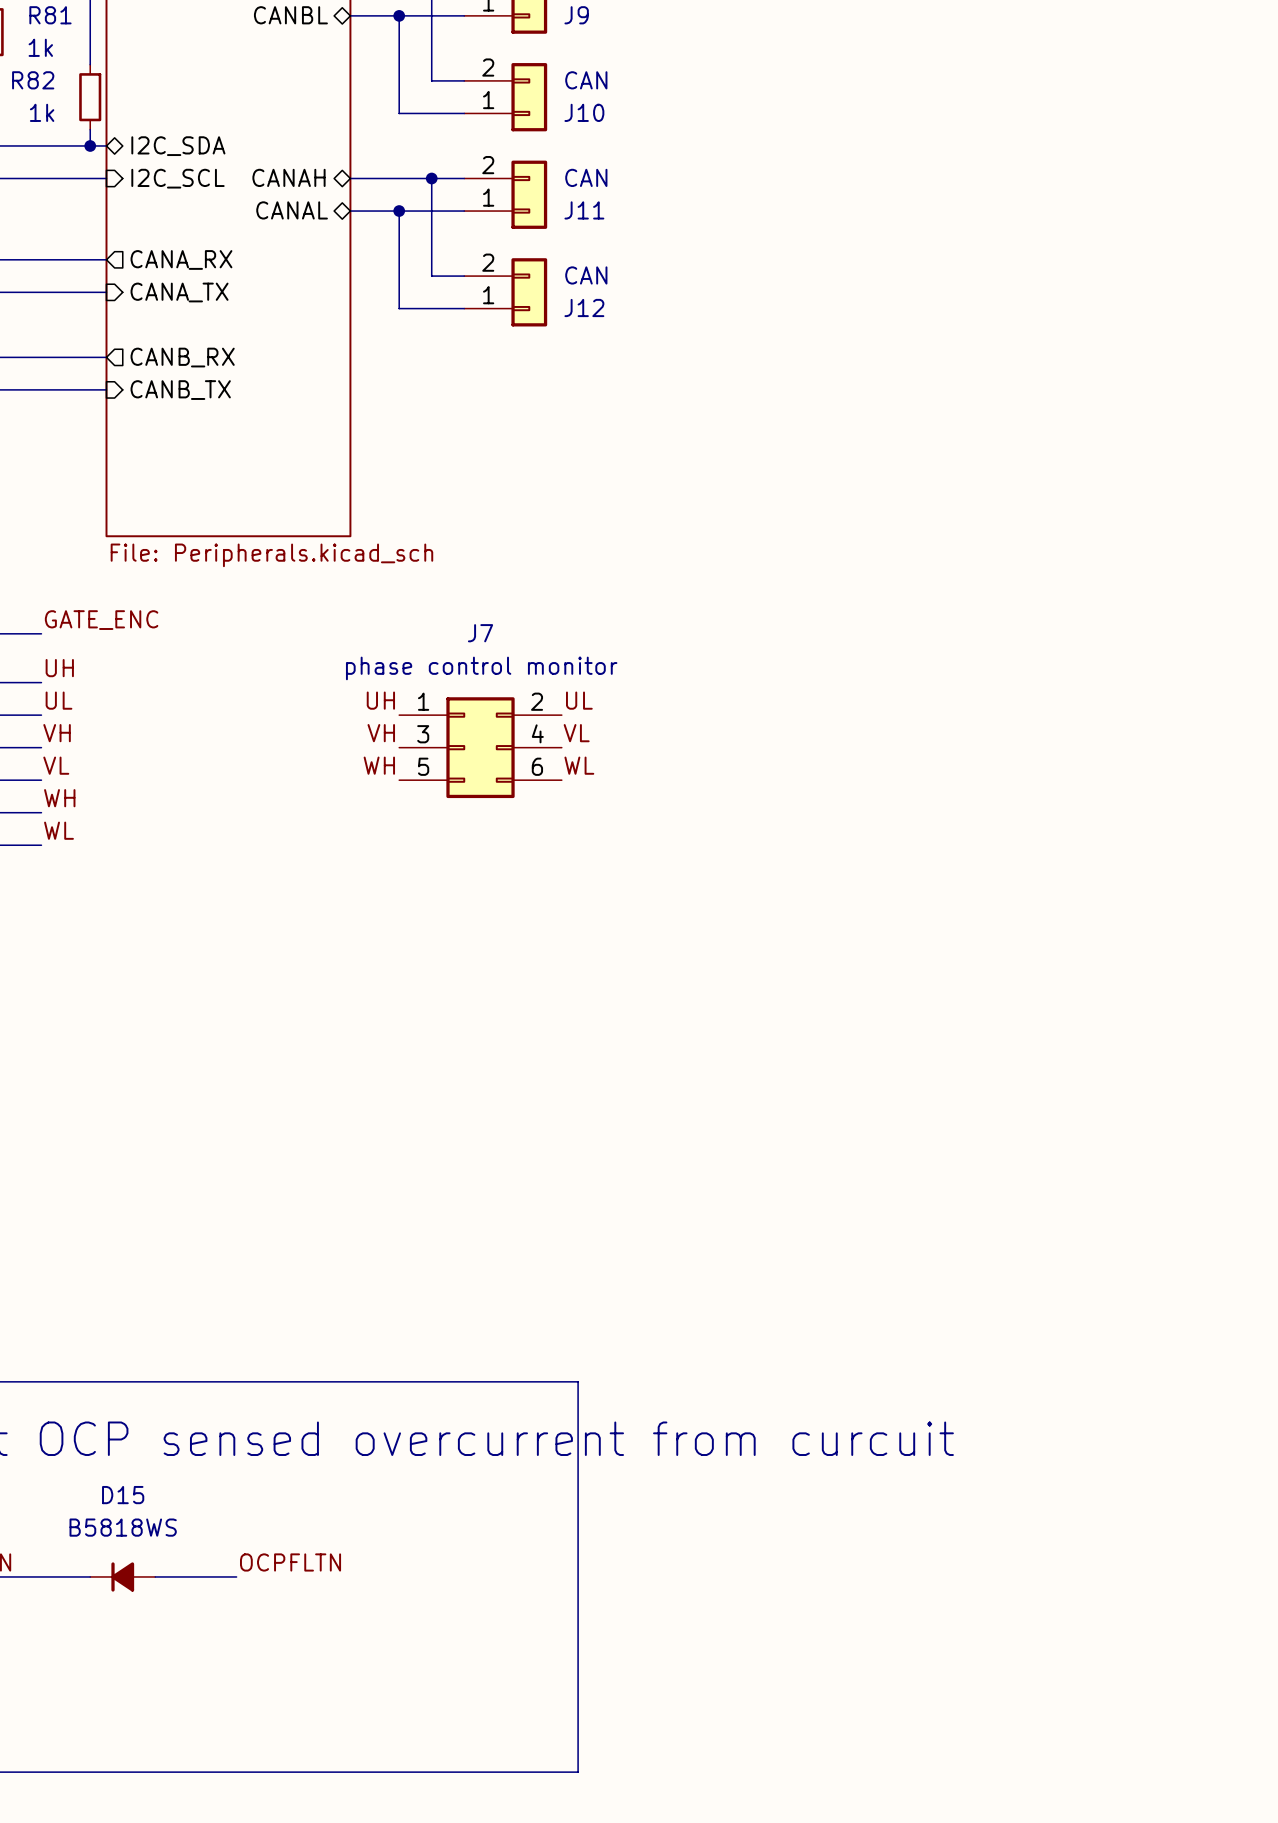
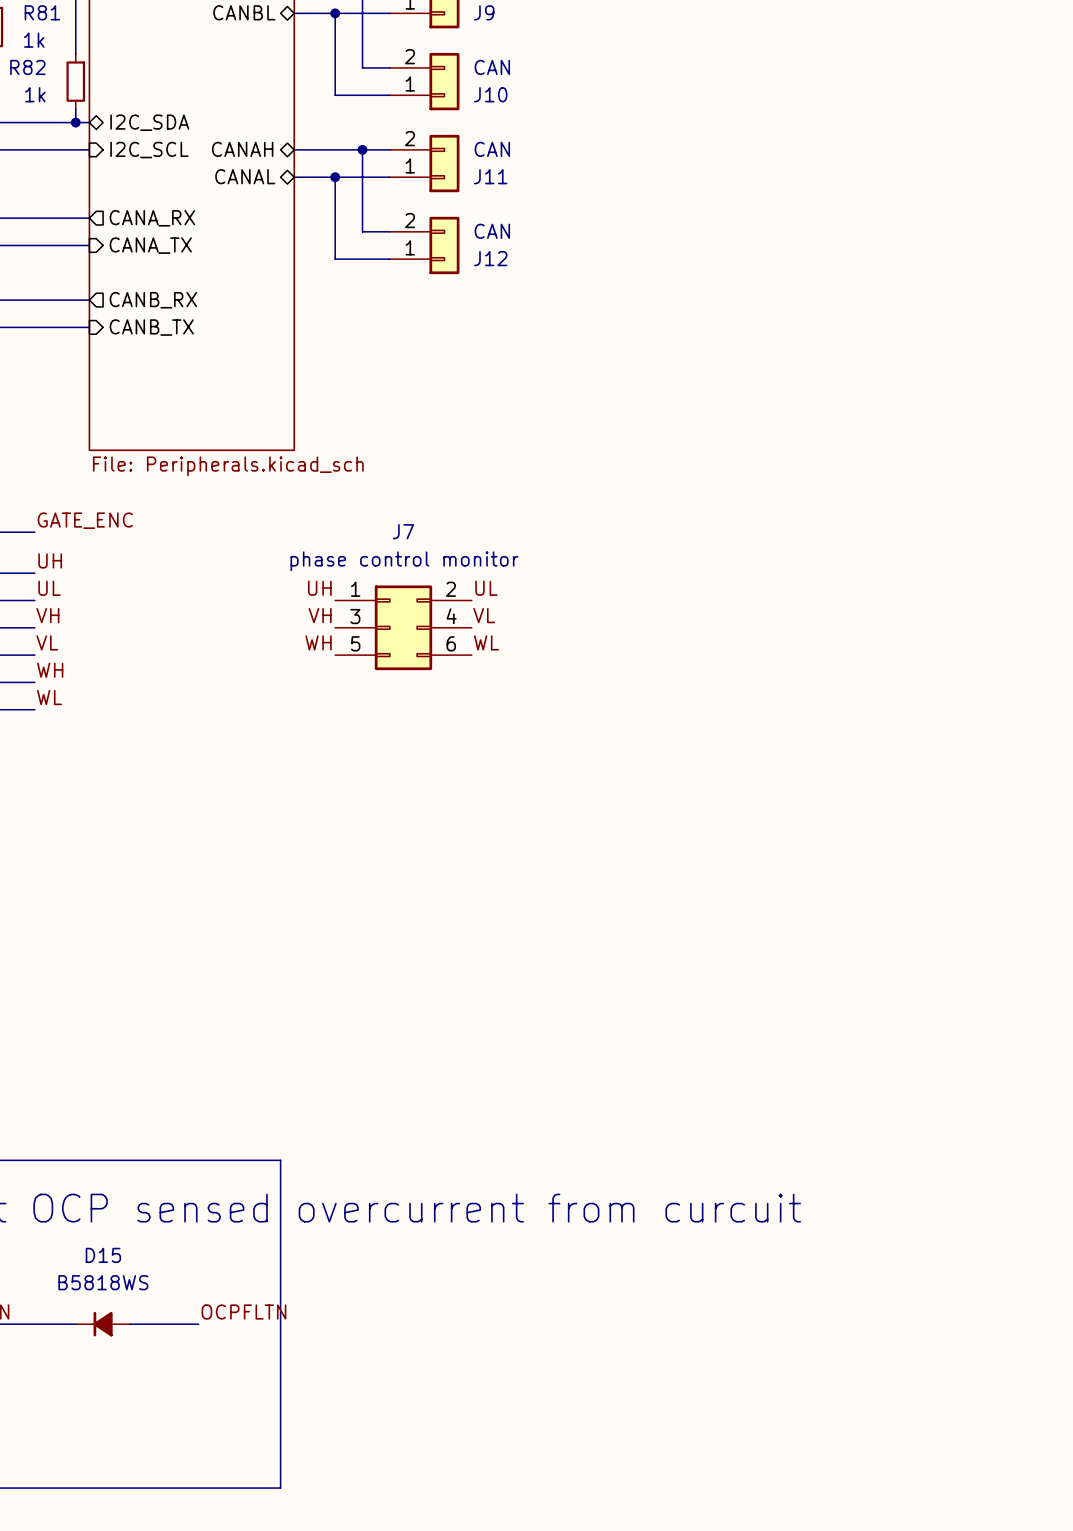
line: (334, 1381) (578, 1381) (578, 1772) (334, 1772) -> (280, 1160) (280, 1488)

